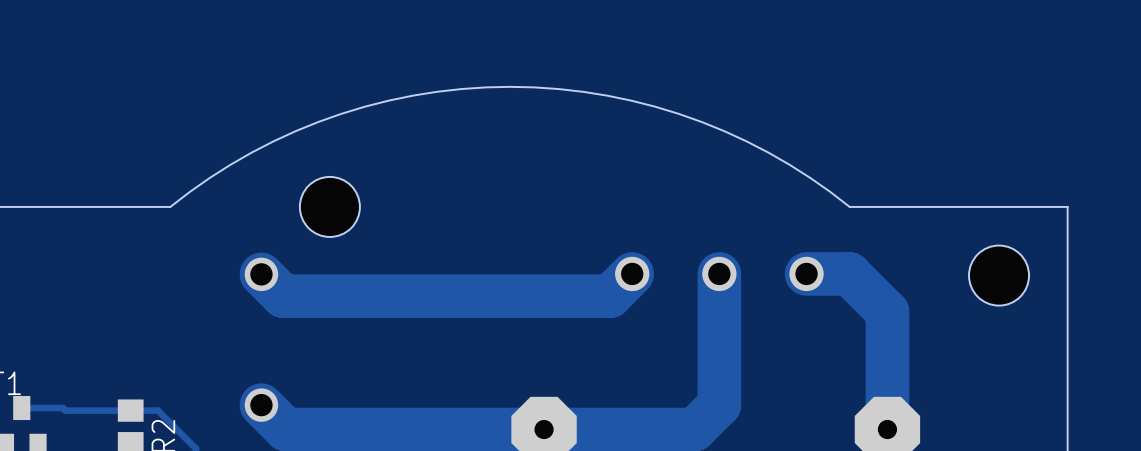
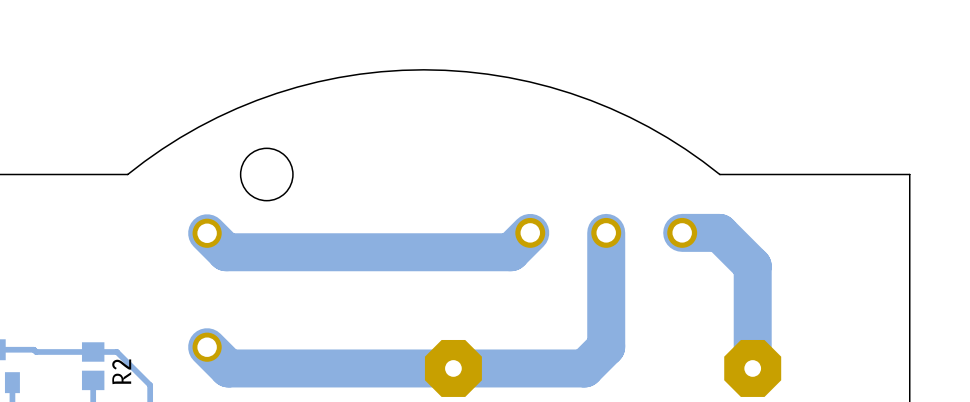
hole: (999, 275) -> none

